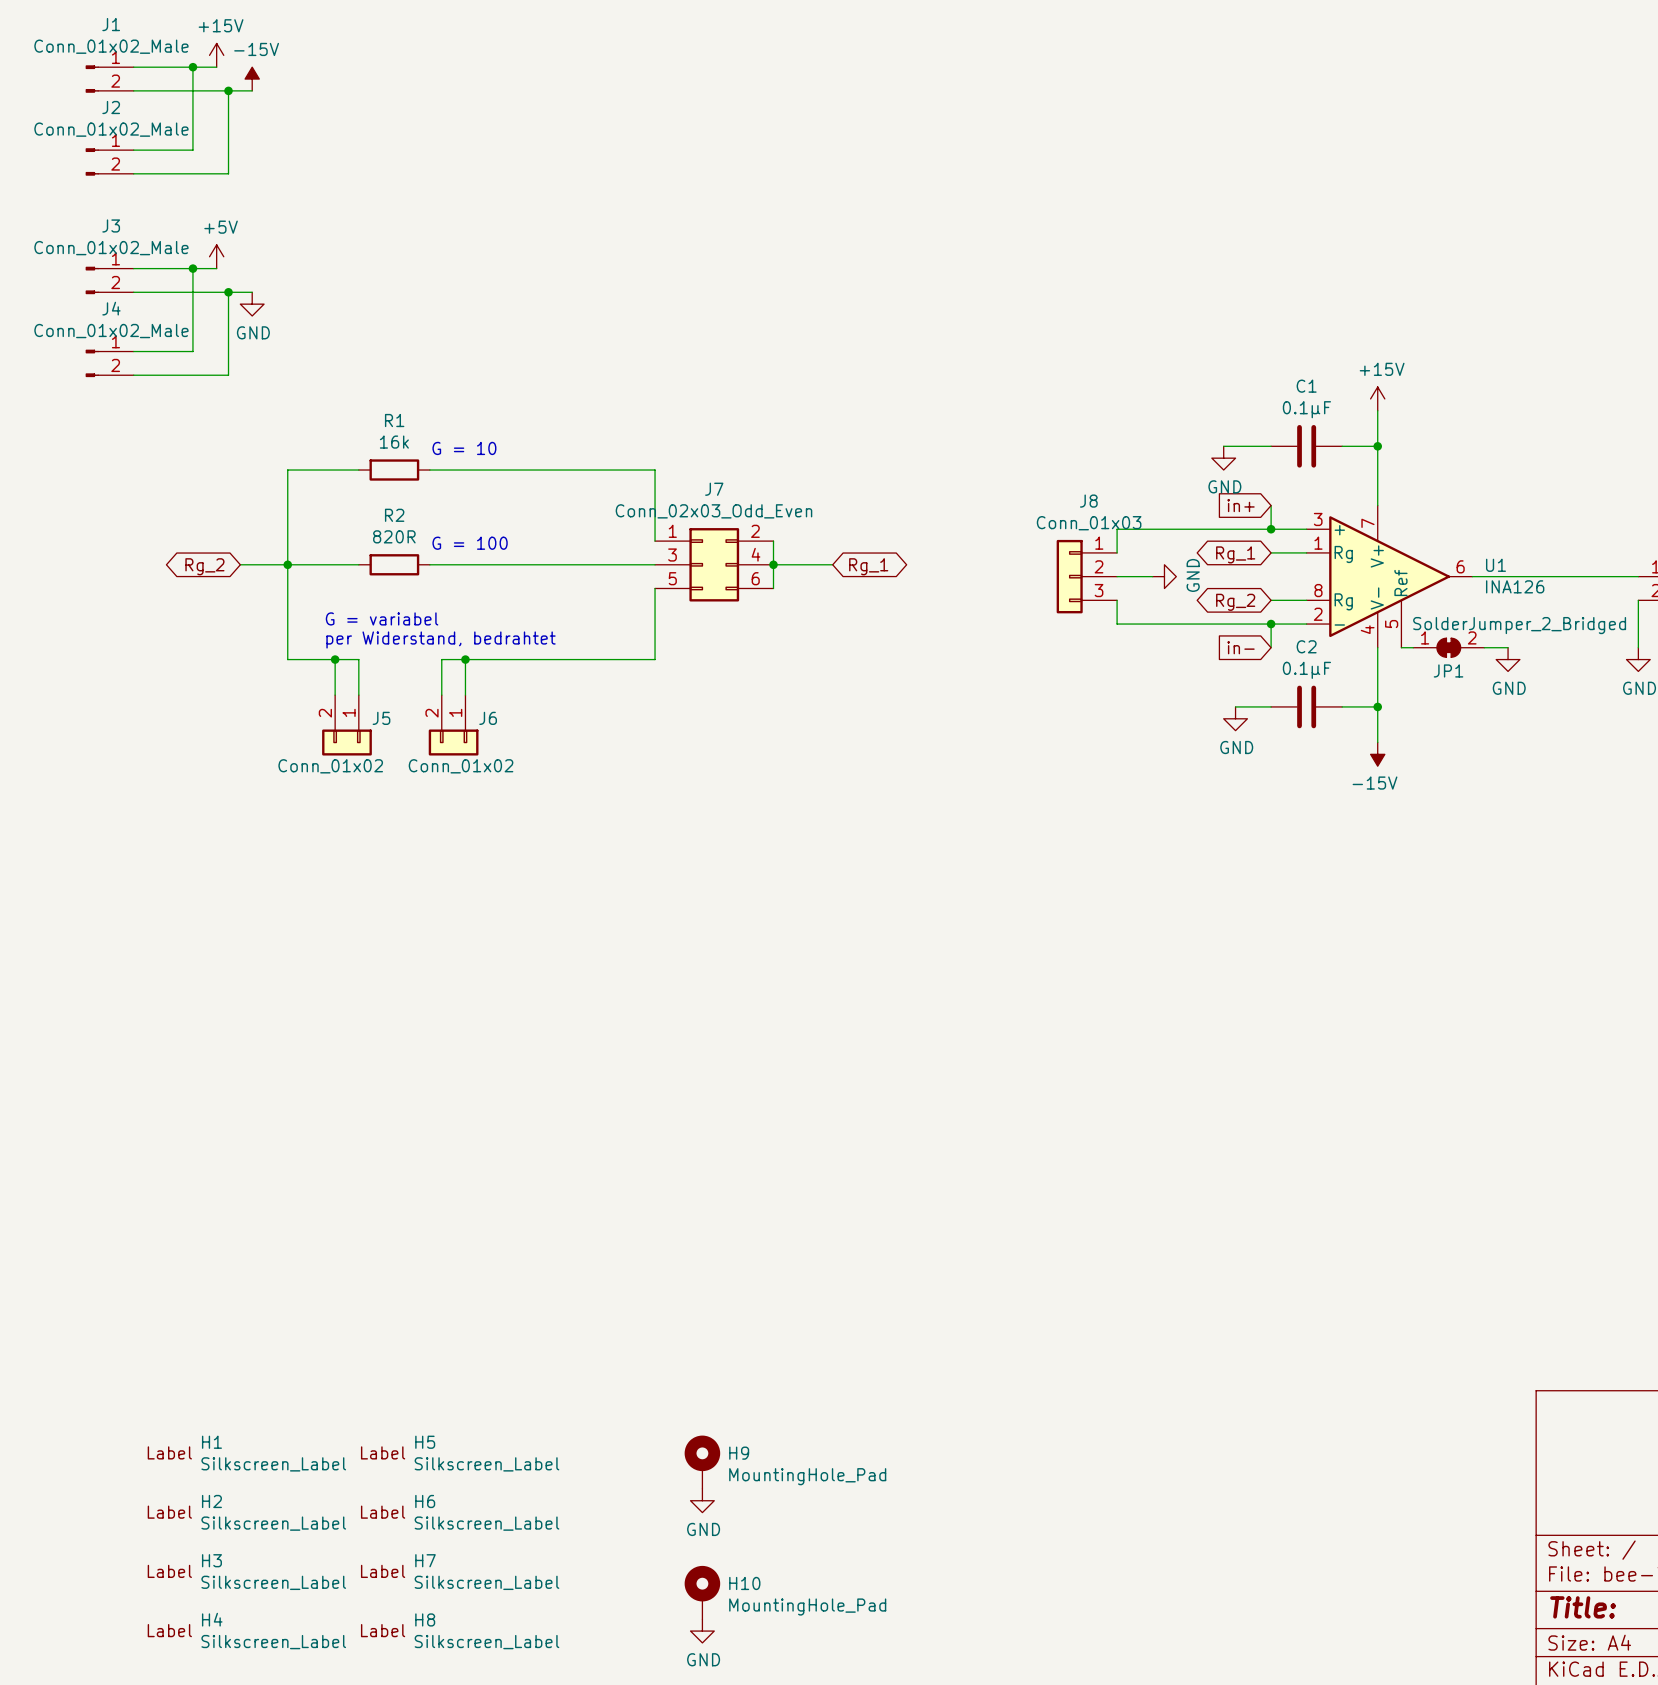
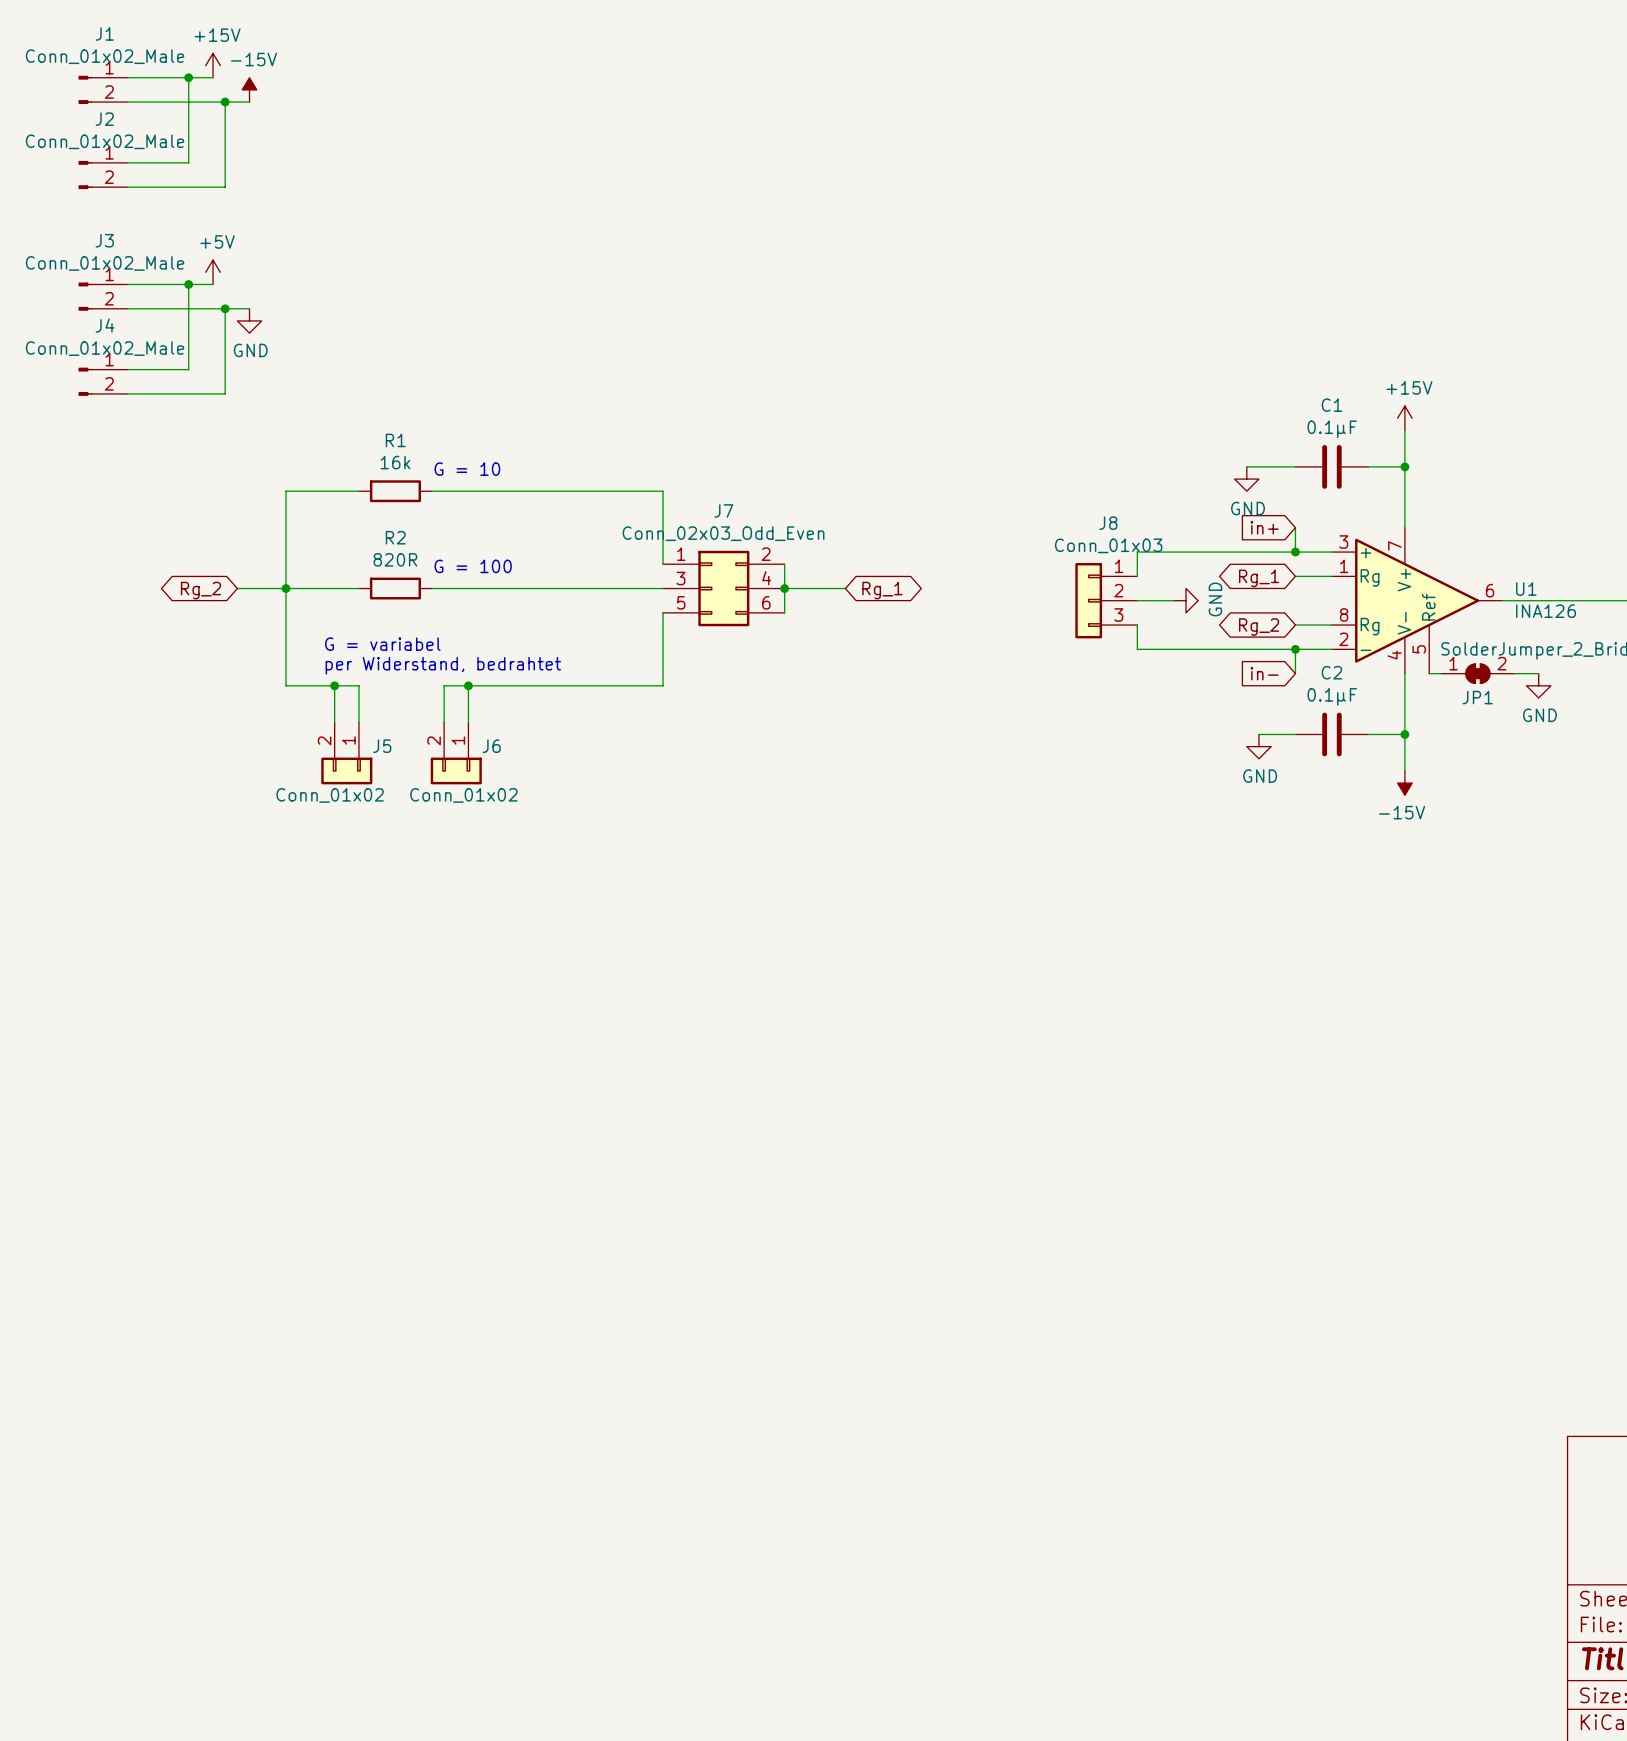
H1: Silkscreen_Label (246, 1453) -> none
H5: Silkscreen_Label (460, 1453) -> none
H9: MountingHole_Pad (702, 1462) -> none
power symbol: GND (702, 1500) -> none
H2: Silkscreen_Label (246, 1512) -> none
H6: Silkscreen_Label (460, 1512) -> none
H3: Silkscreen_Label (246, 1572) -> none
H7: Silkscreen_Label (460, 1572) -> none
H10: MountingHole_Pad (702, 1592) -> none
H4: Silkscreen_Label (246, 1631) -> none
H8: Silkscreen_Label (460, 1631) -> none
power symbol: GND (702, 1631) -> none

